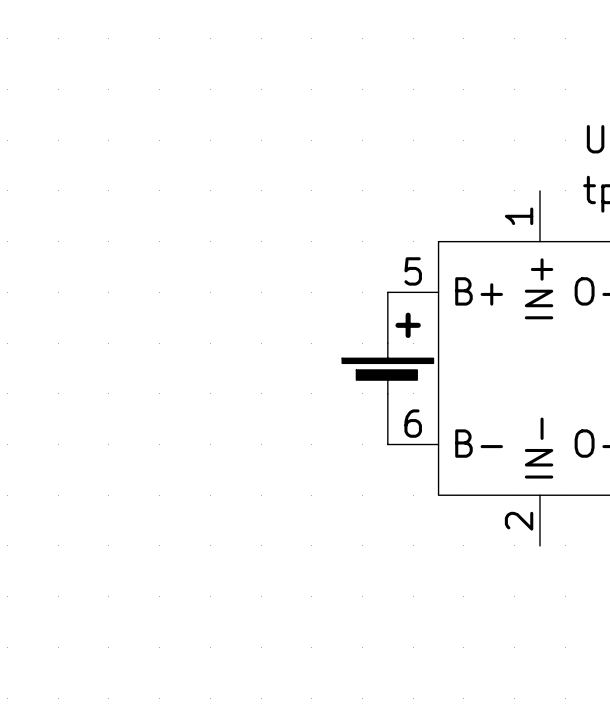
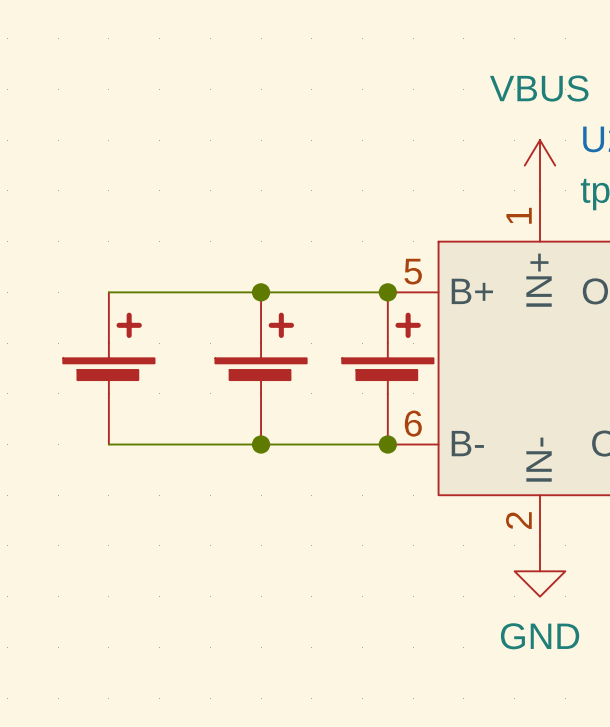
power symbol: none -> VBUS (539, 165)
wire: none -> (108, 292) (387, 292)
junction: none -> (261, 292)
junction: none -> (387, 292)
part: none -> (108, 368)
part: none -> (261, 368)
wire: none -> (108, 444) (387, 444)
junction: none -> (261, 444)
junction: none -> (387, 444)
power symbol: none -> GND (539, 571)

